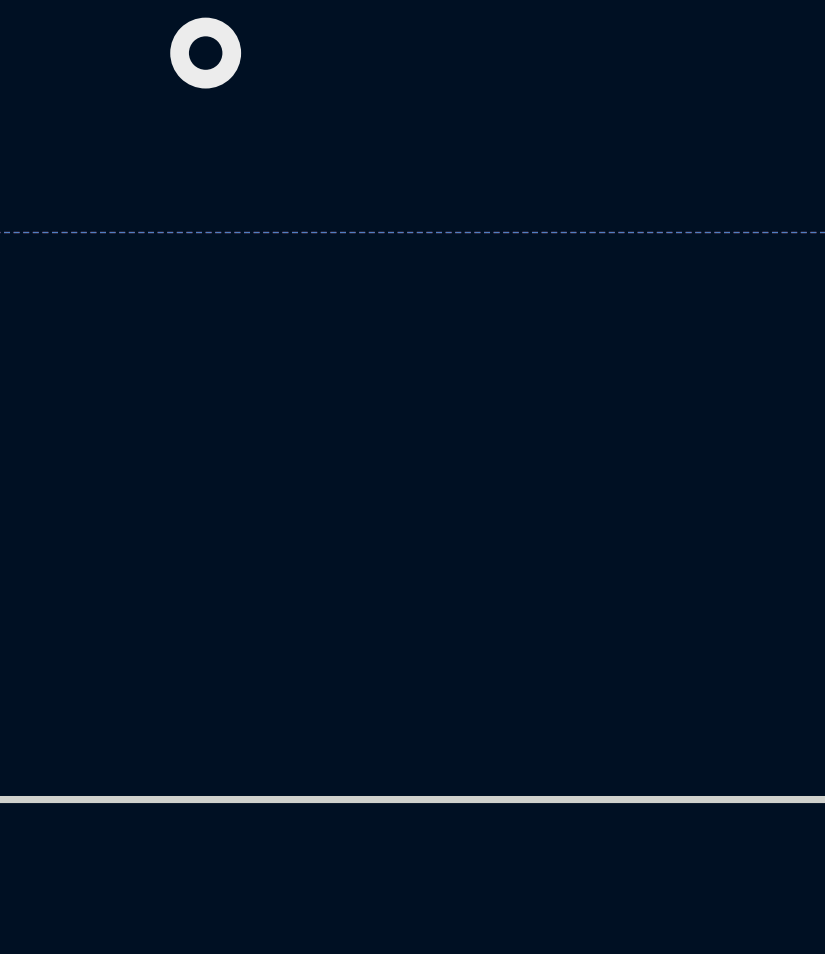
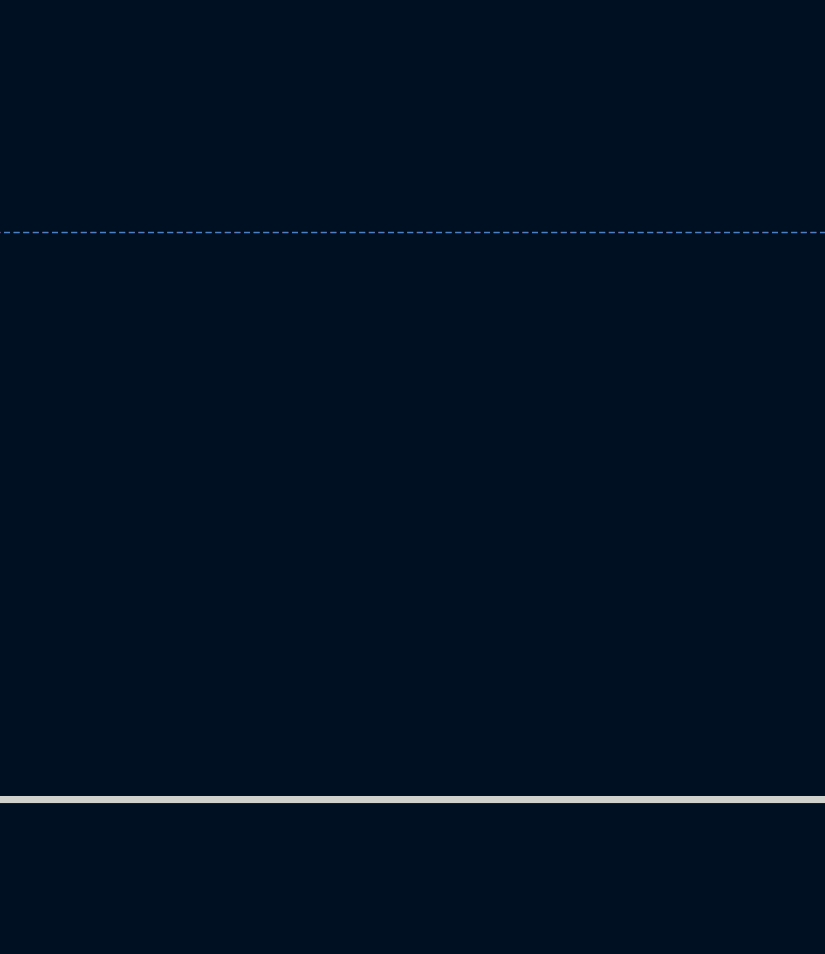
via: (205, 53) -> none

